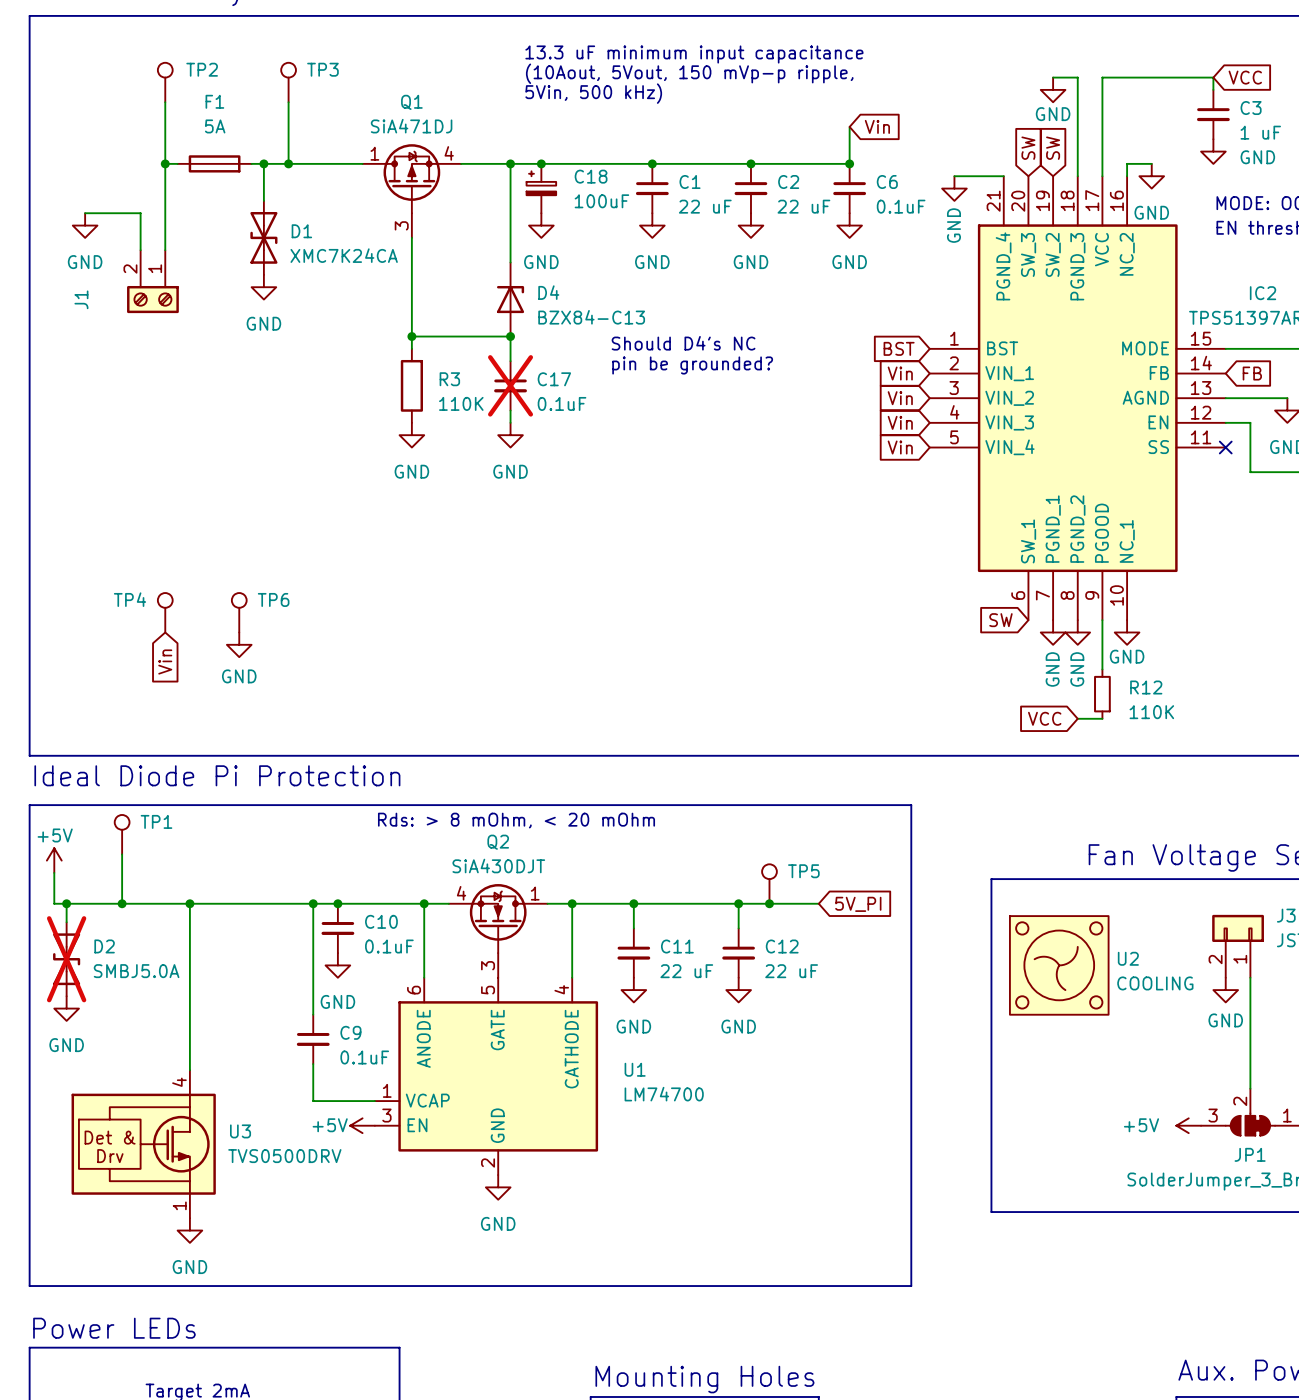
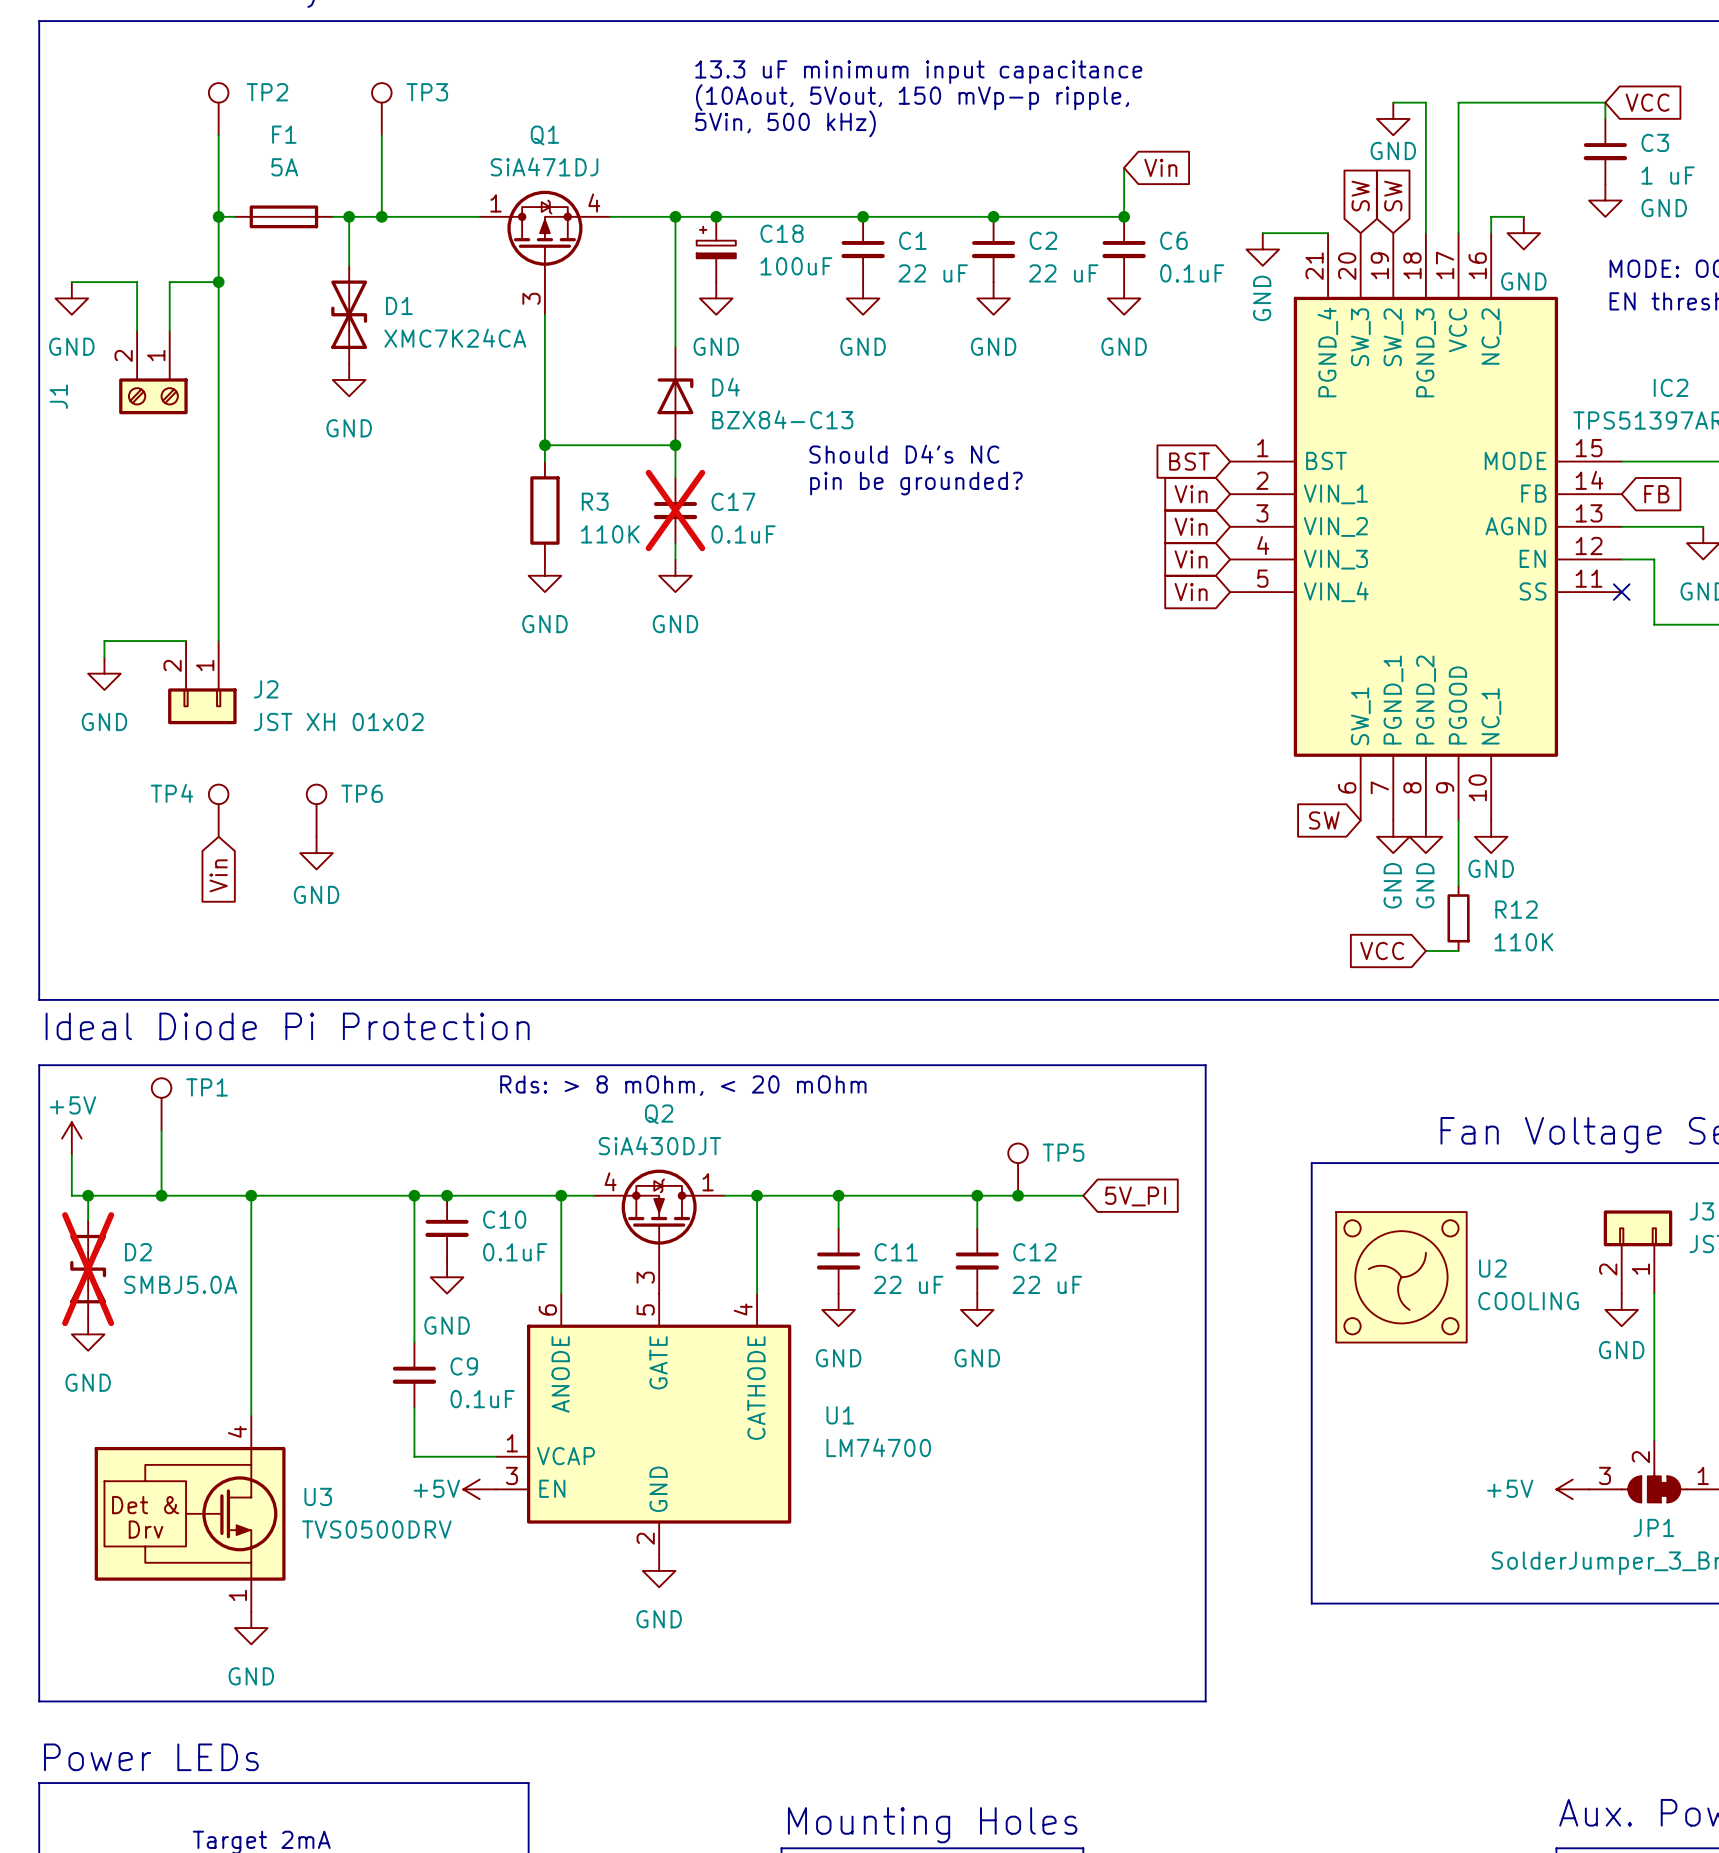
wire: none -> (71, 282) (112, 282)
wire: (103, 213) (128, 213) -> (137, 282) (137, 331)
wire: none -> (169, 282) (169, 331)
wire: (140, 213) (140, 250) -> (186, 282) (218, 282)
junction: none -> (218, 282)
power symbol position: GND (85, 225) -> GND (71, 298)
wire: none -> (218, 331) (218, 641)
J1 position: (152, 281) -> (153, 372)
wire: none -> (186, 641) (104, 641) (104, 657)
power symbol: none -> GND (104, 673)
J2: none -> JST XH 01x02 (202, 682)

